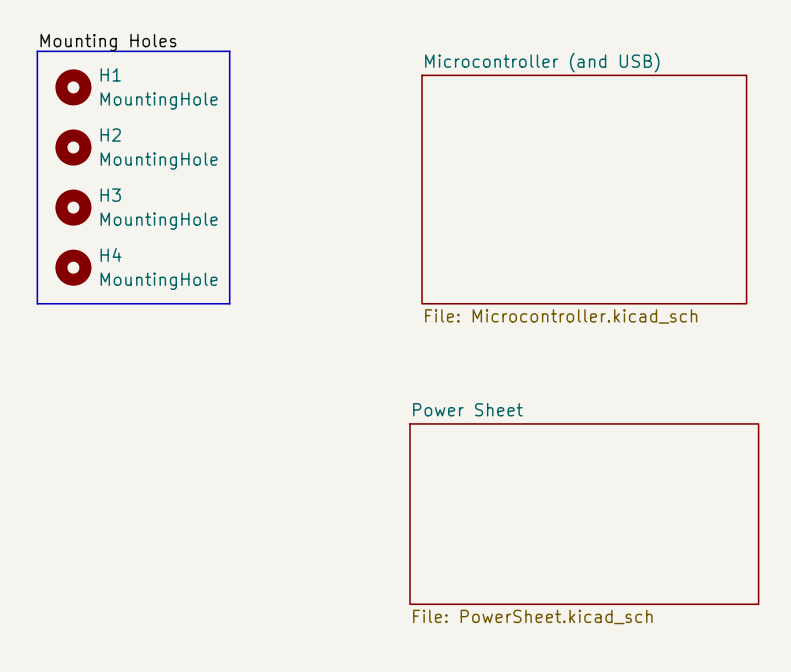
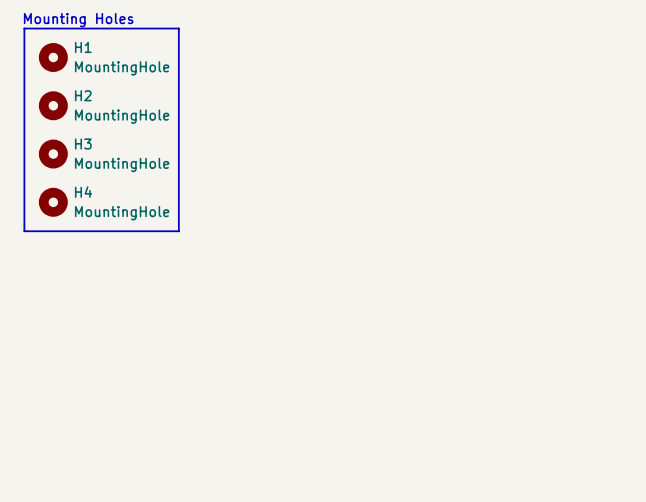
text: none -> Mounting Holes (78, 20)
label: Mounting Holes (108, 42) -> none
sheet Microcontroller (and USB): File: Microcontroller.kicad_sch (584, 189) -> none
sheet Power Sheet: File: PowerSheet.kicad_sch (584, 514) -> none

